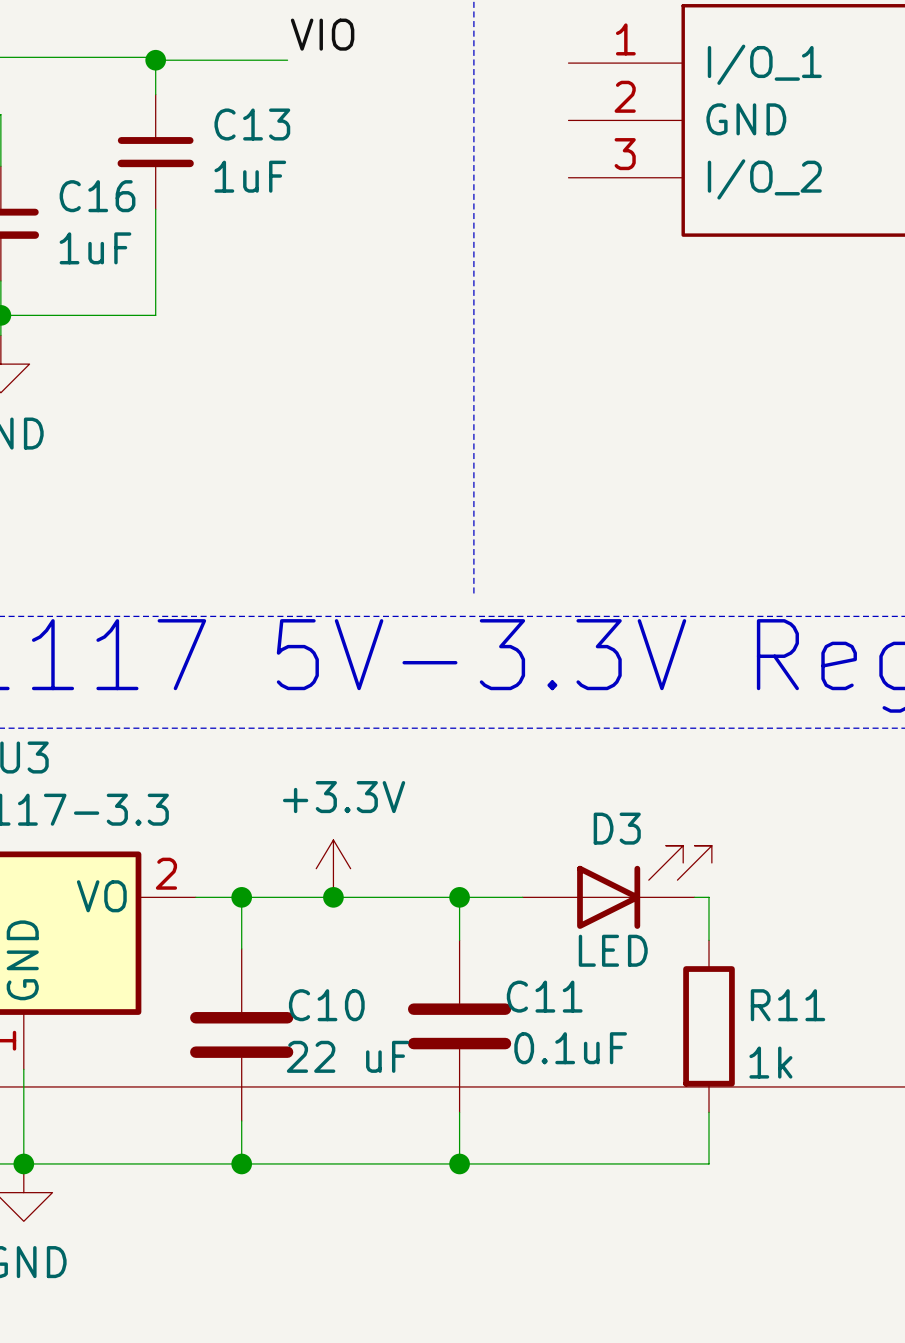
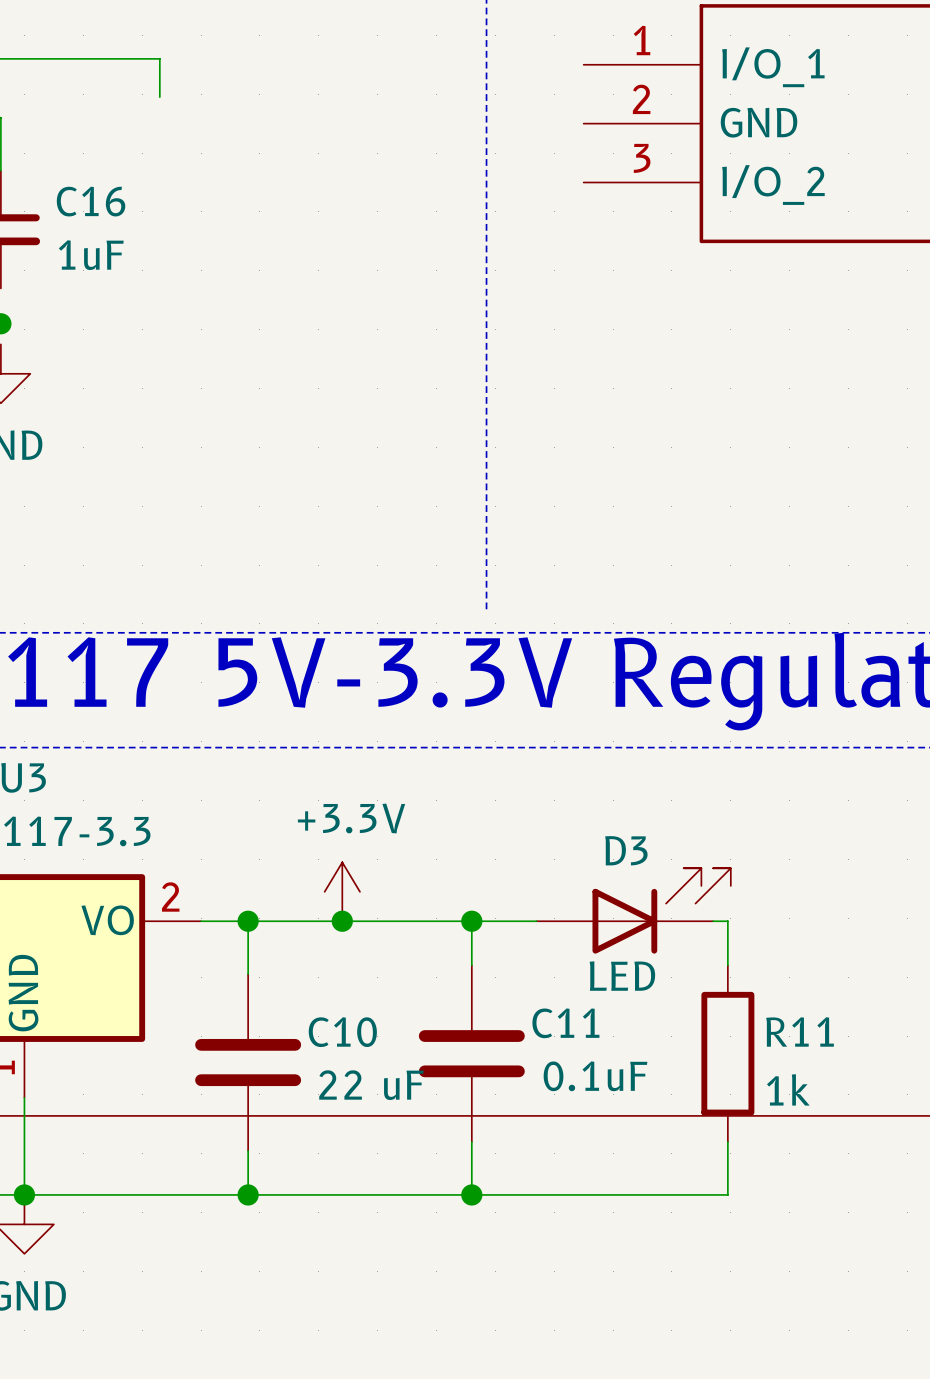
label: VIO (322, 34) -> none
wire: (155, 60) (287, 60) -> none
junction: (155, 60) -> none
C13: 1uF (155, 151) -> none
wire: (155, 209) (155, 315) (0, 315) -> none
wire: (0, 280) (0, 335) -> none

